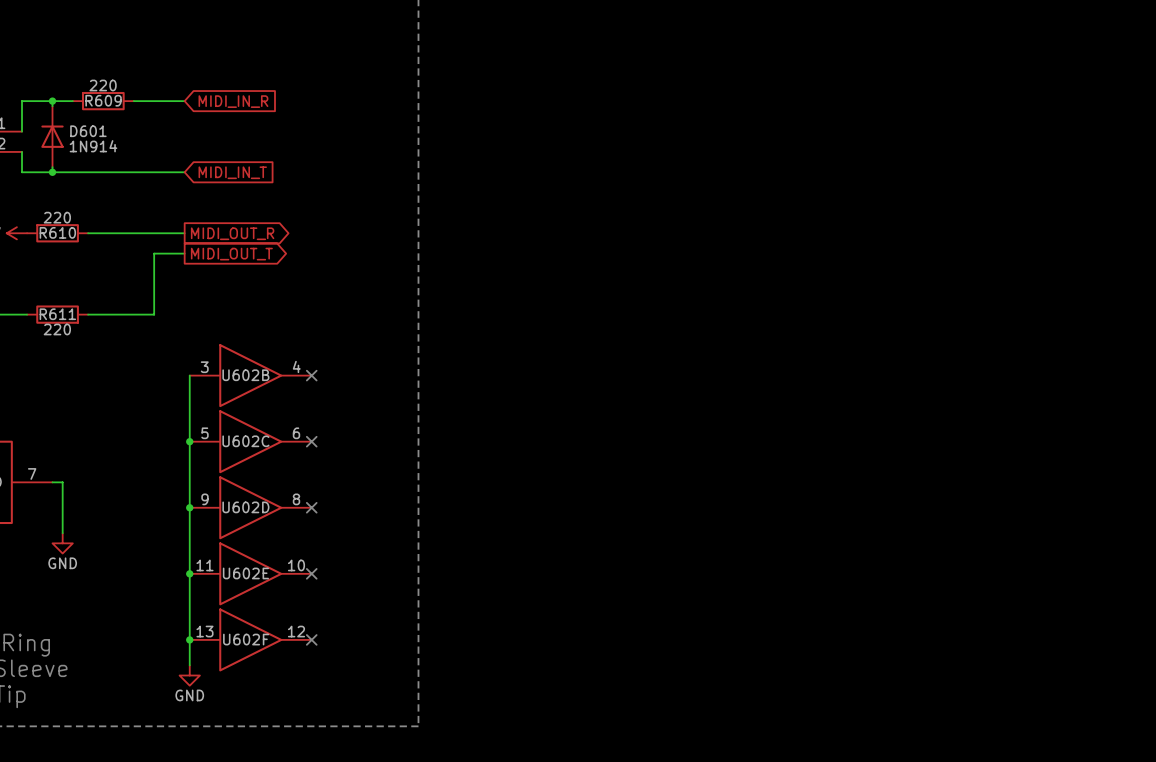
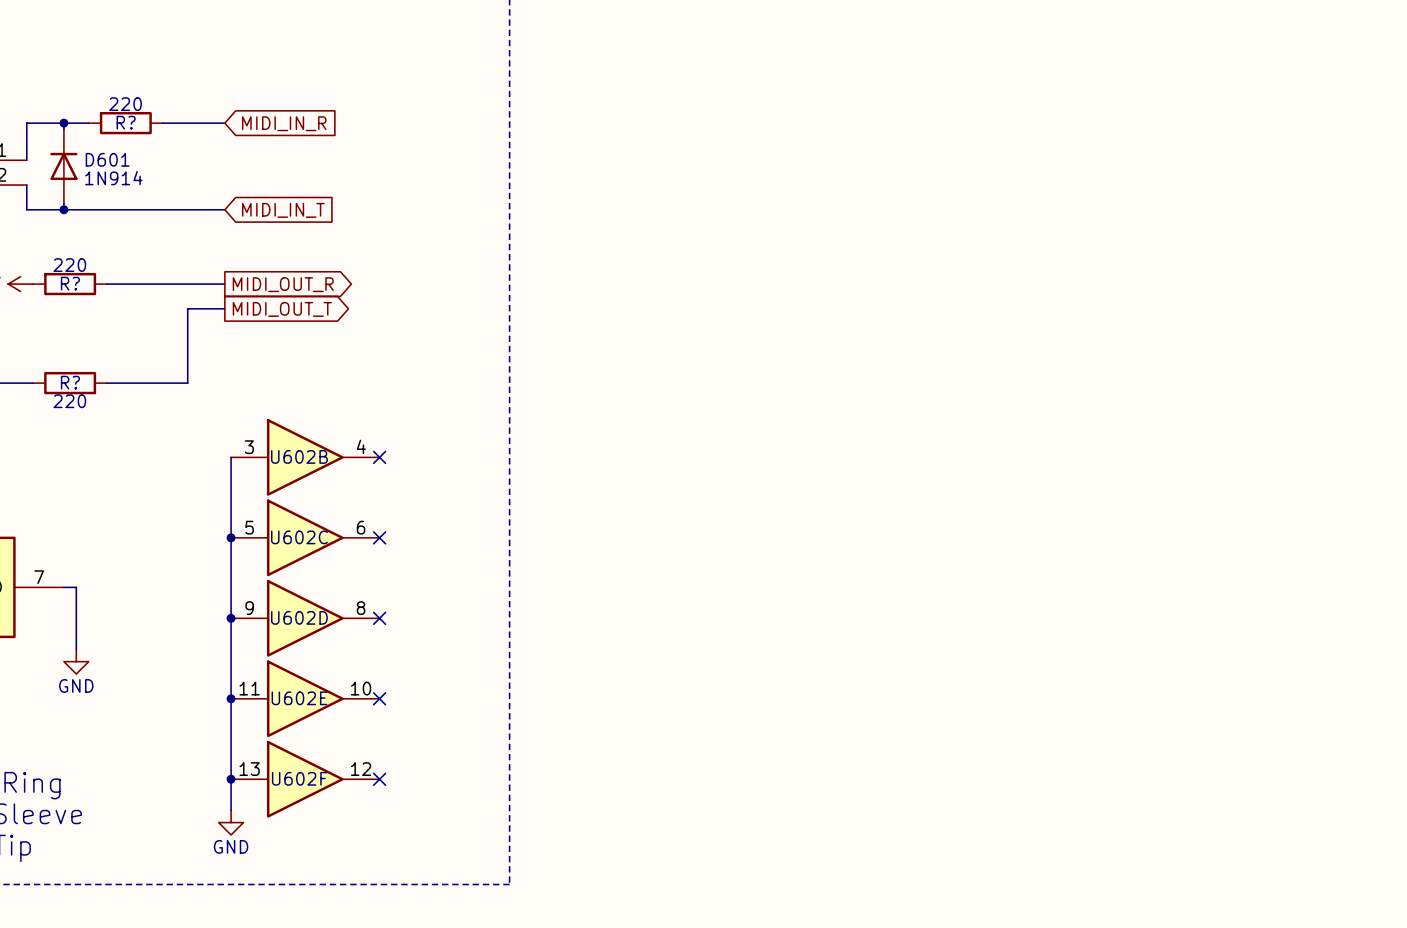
R609 name: R609 (103, 100) -> R? (126, 122)
R610 name: R610 (57, 232) -> R? (70, 283)
R611 name: R611 (57, 314) -> R? (70, 382)

